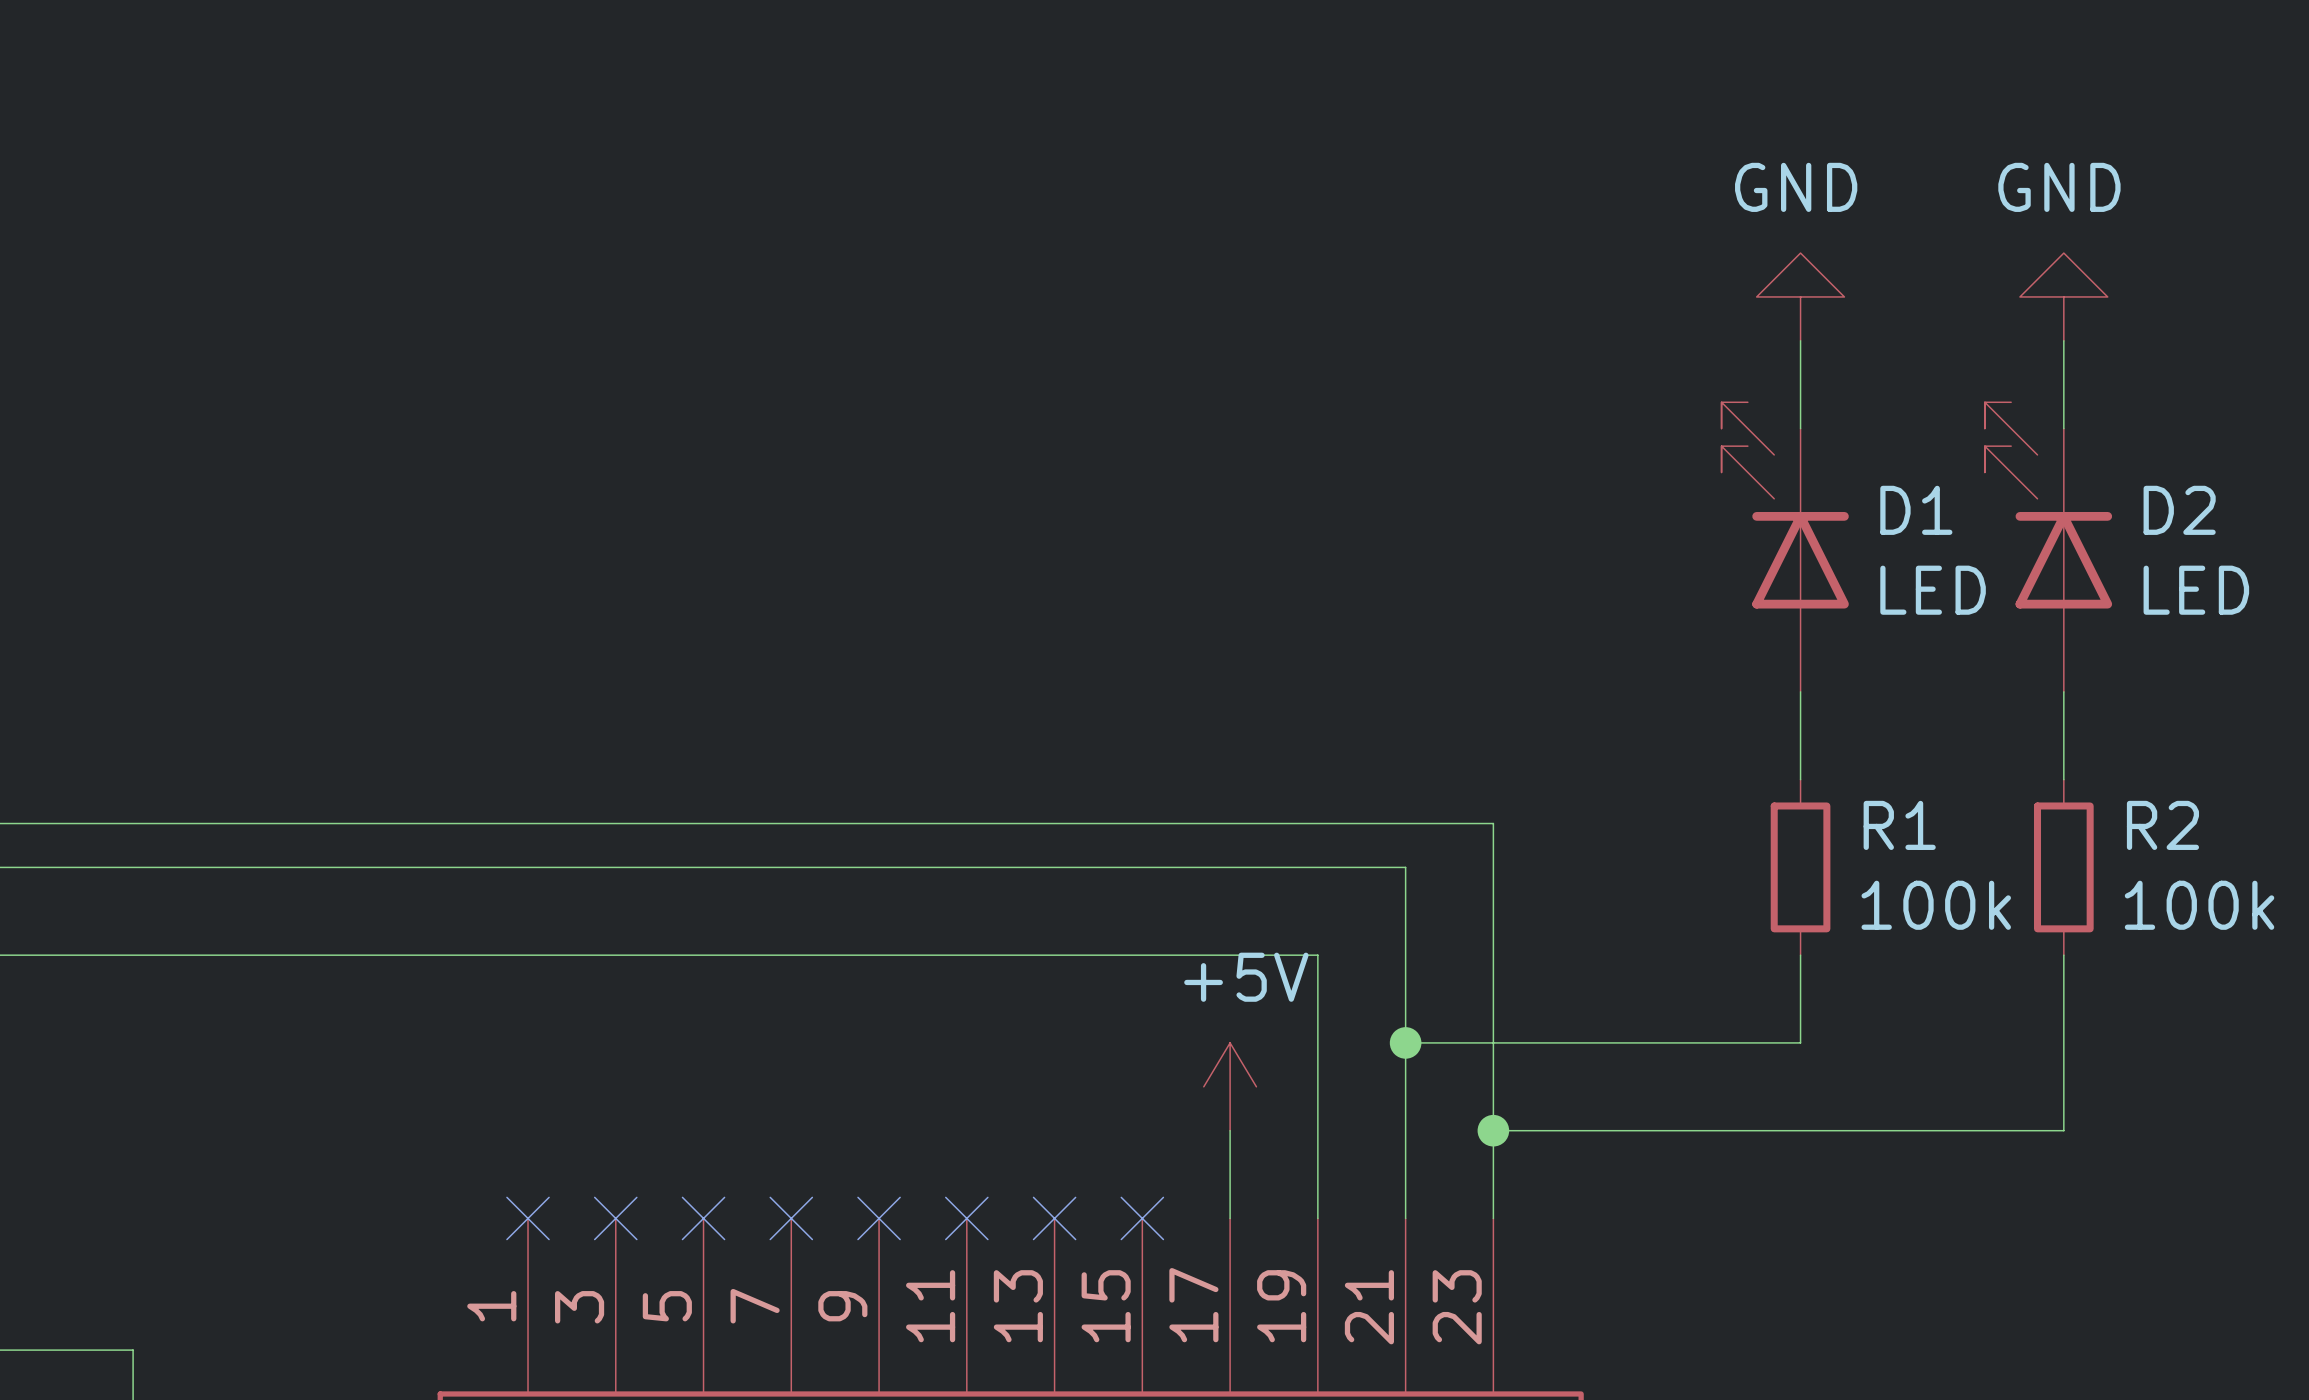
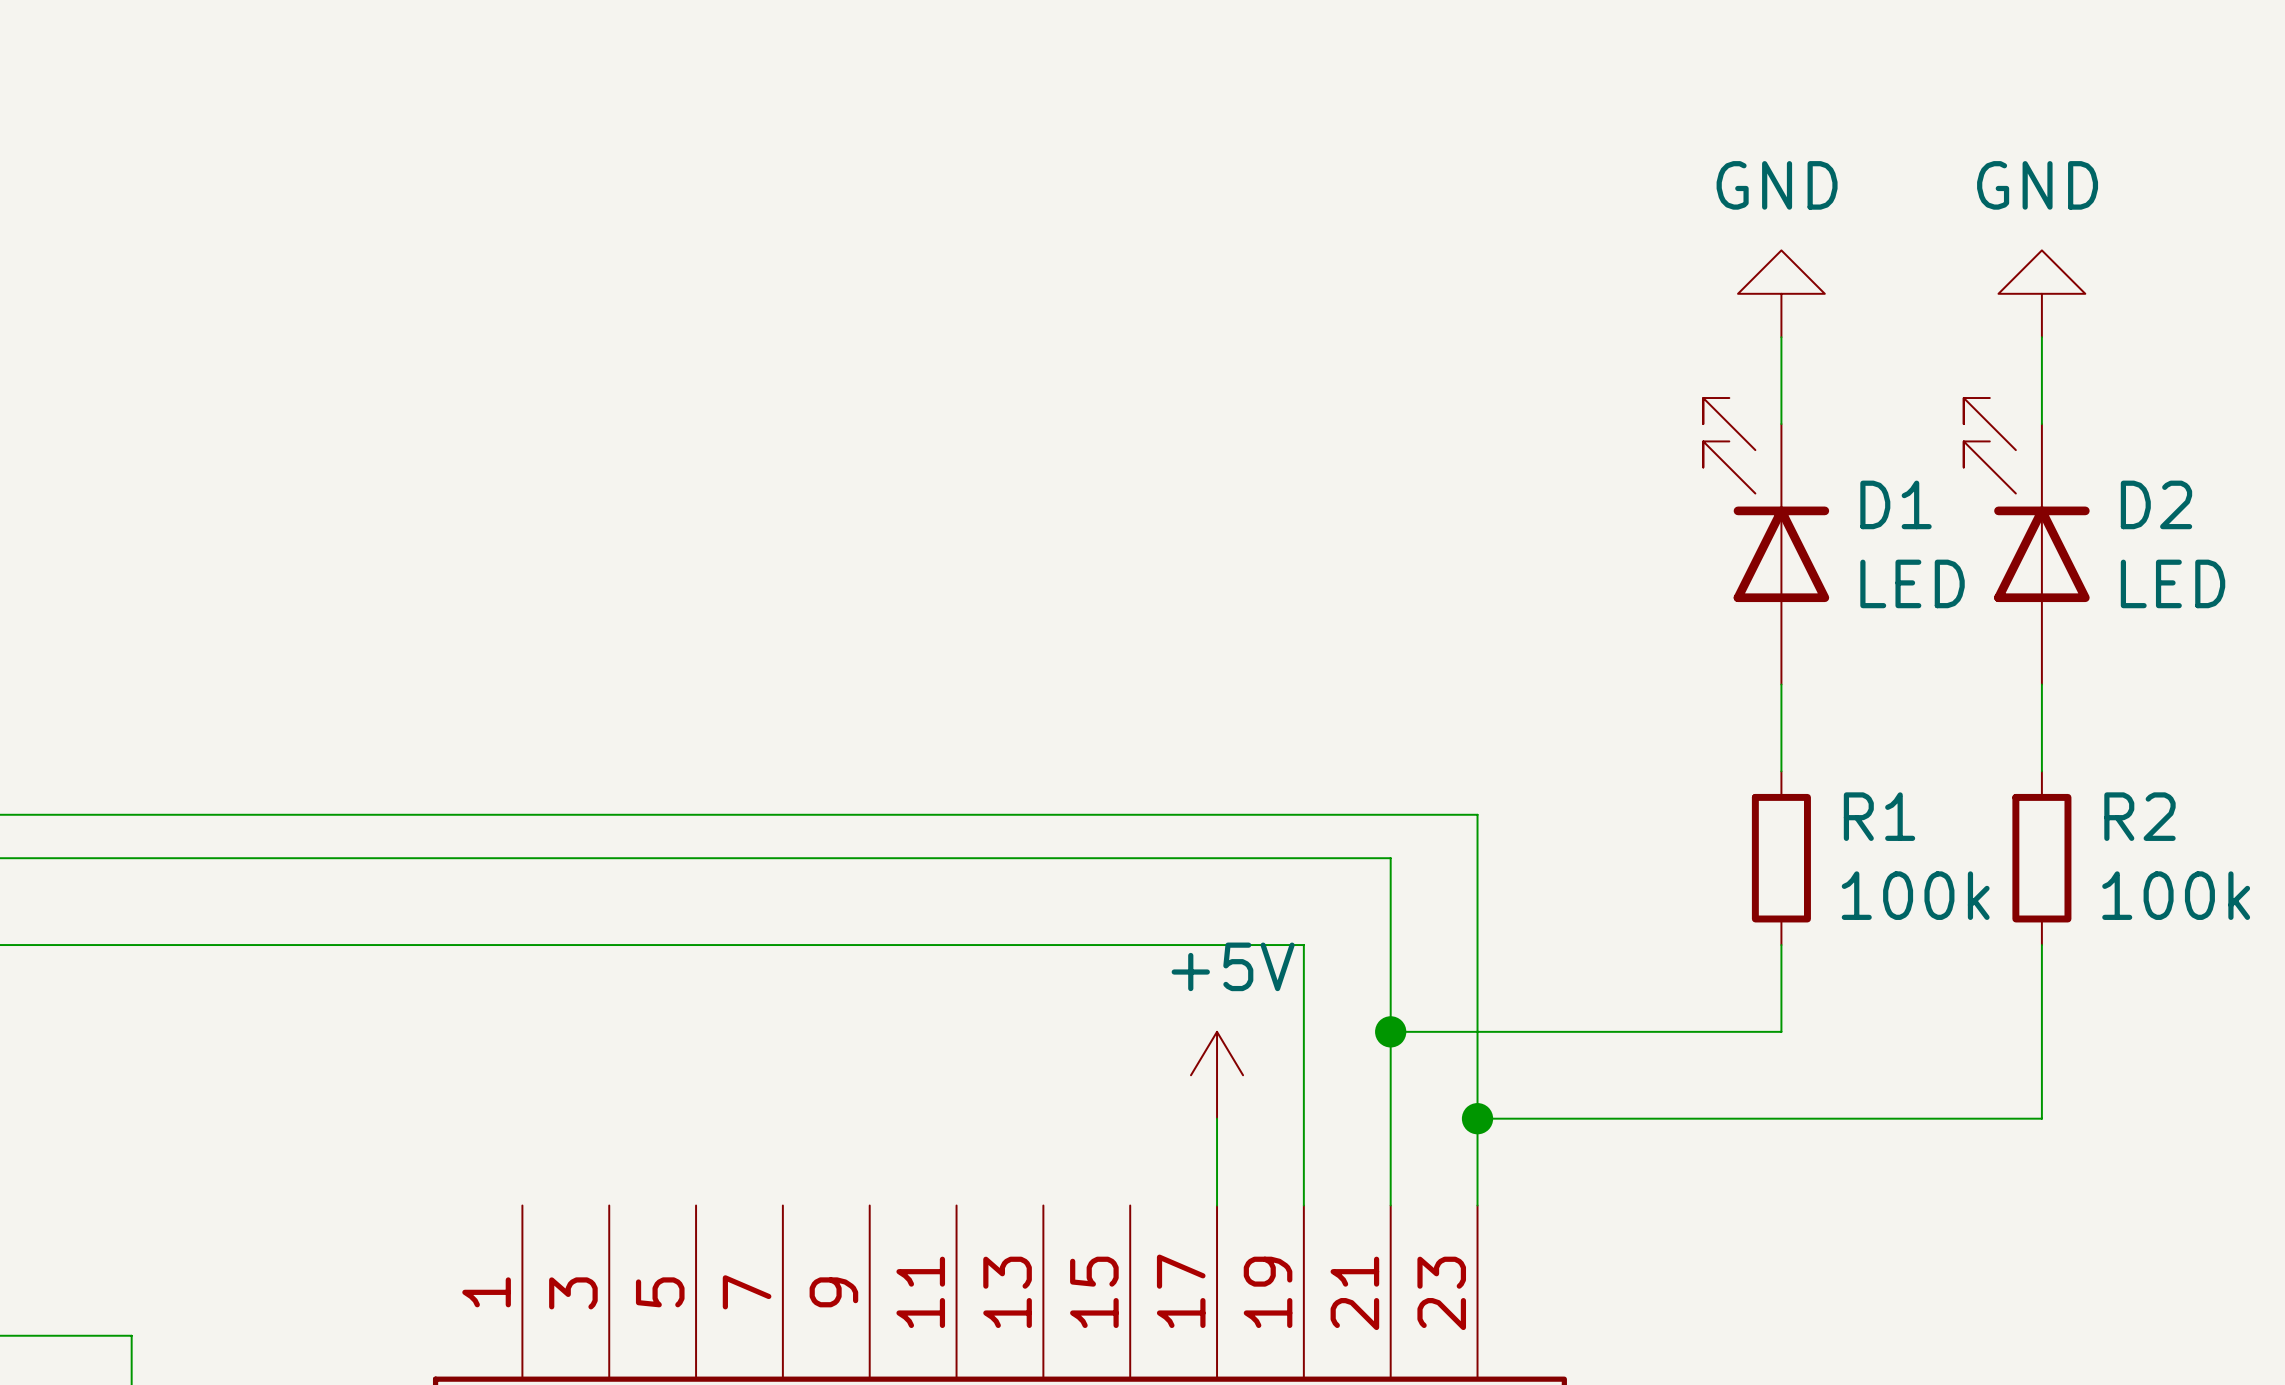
no-connect mark: (528, 1218) -> none
no-connect mark: (615, 1218) -> none
no-connect mark: (703, 1218) -> none
no-connect mark: (791, 1218) -> none
no-connect mark: (879, 1218) -> none
no-connect mark: (966, 1218) -> none
no-connect mark: (1054, 1218) -> none
no-connect mark: (1142, 1218) -> none

